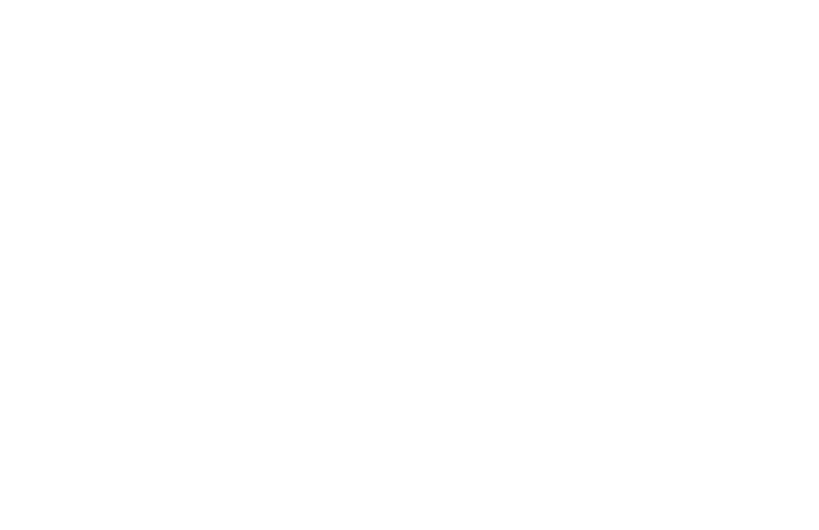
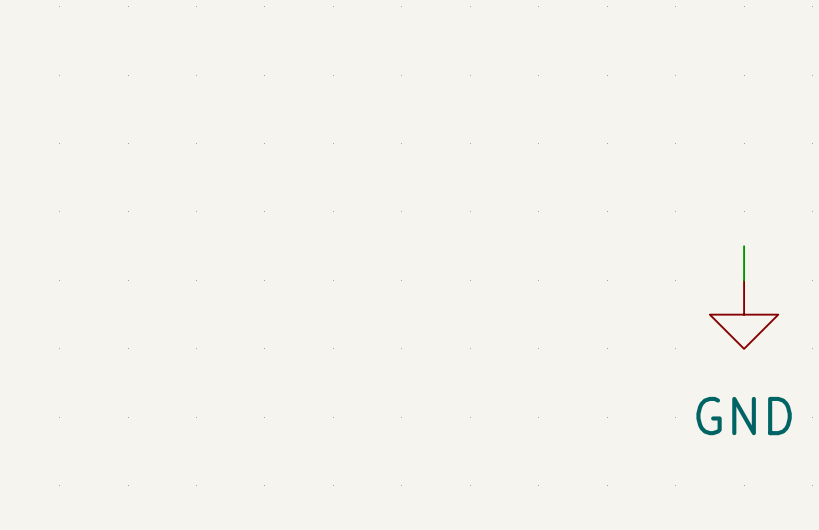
wire: none -> (744, 246) (744, 280)
power symbol: none -> GND (744, 314)

